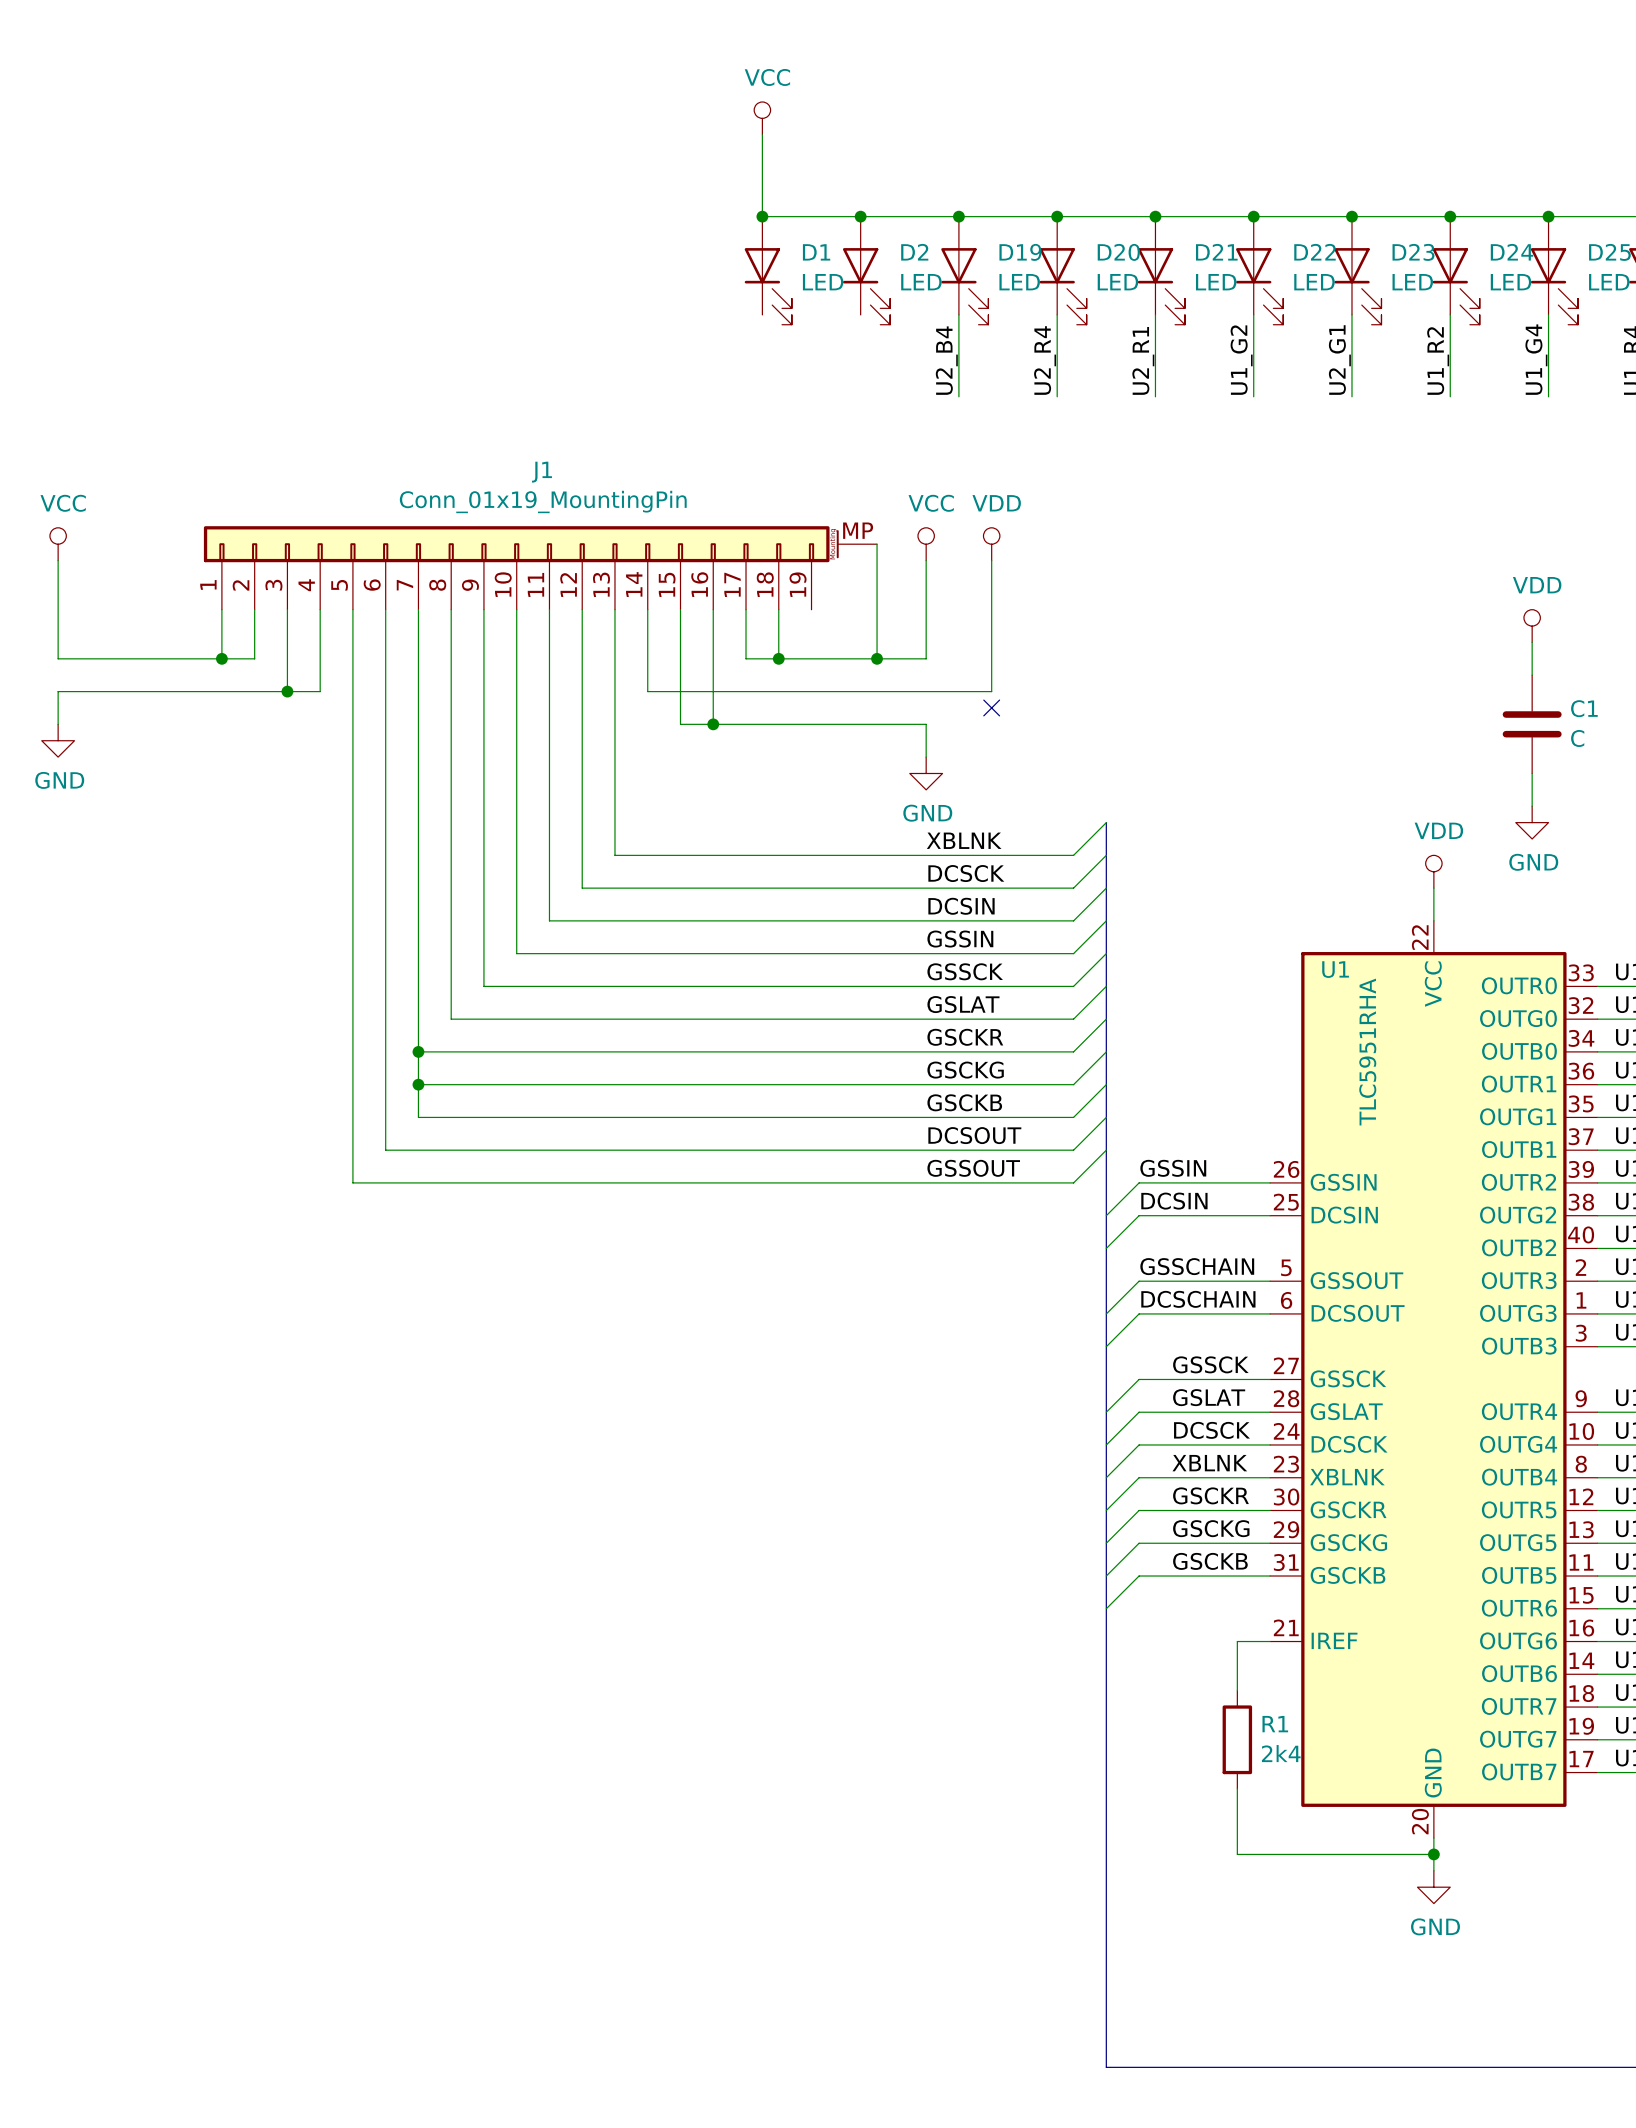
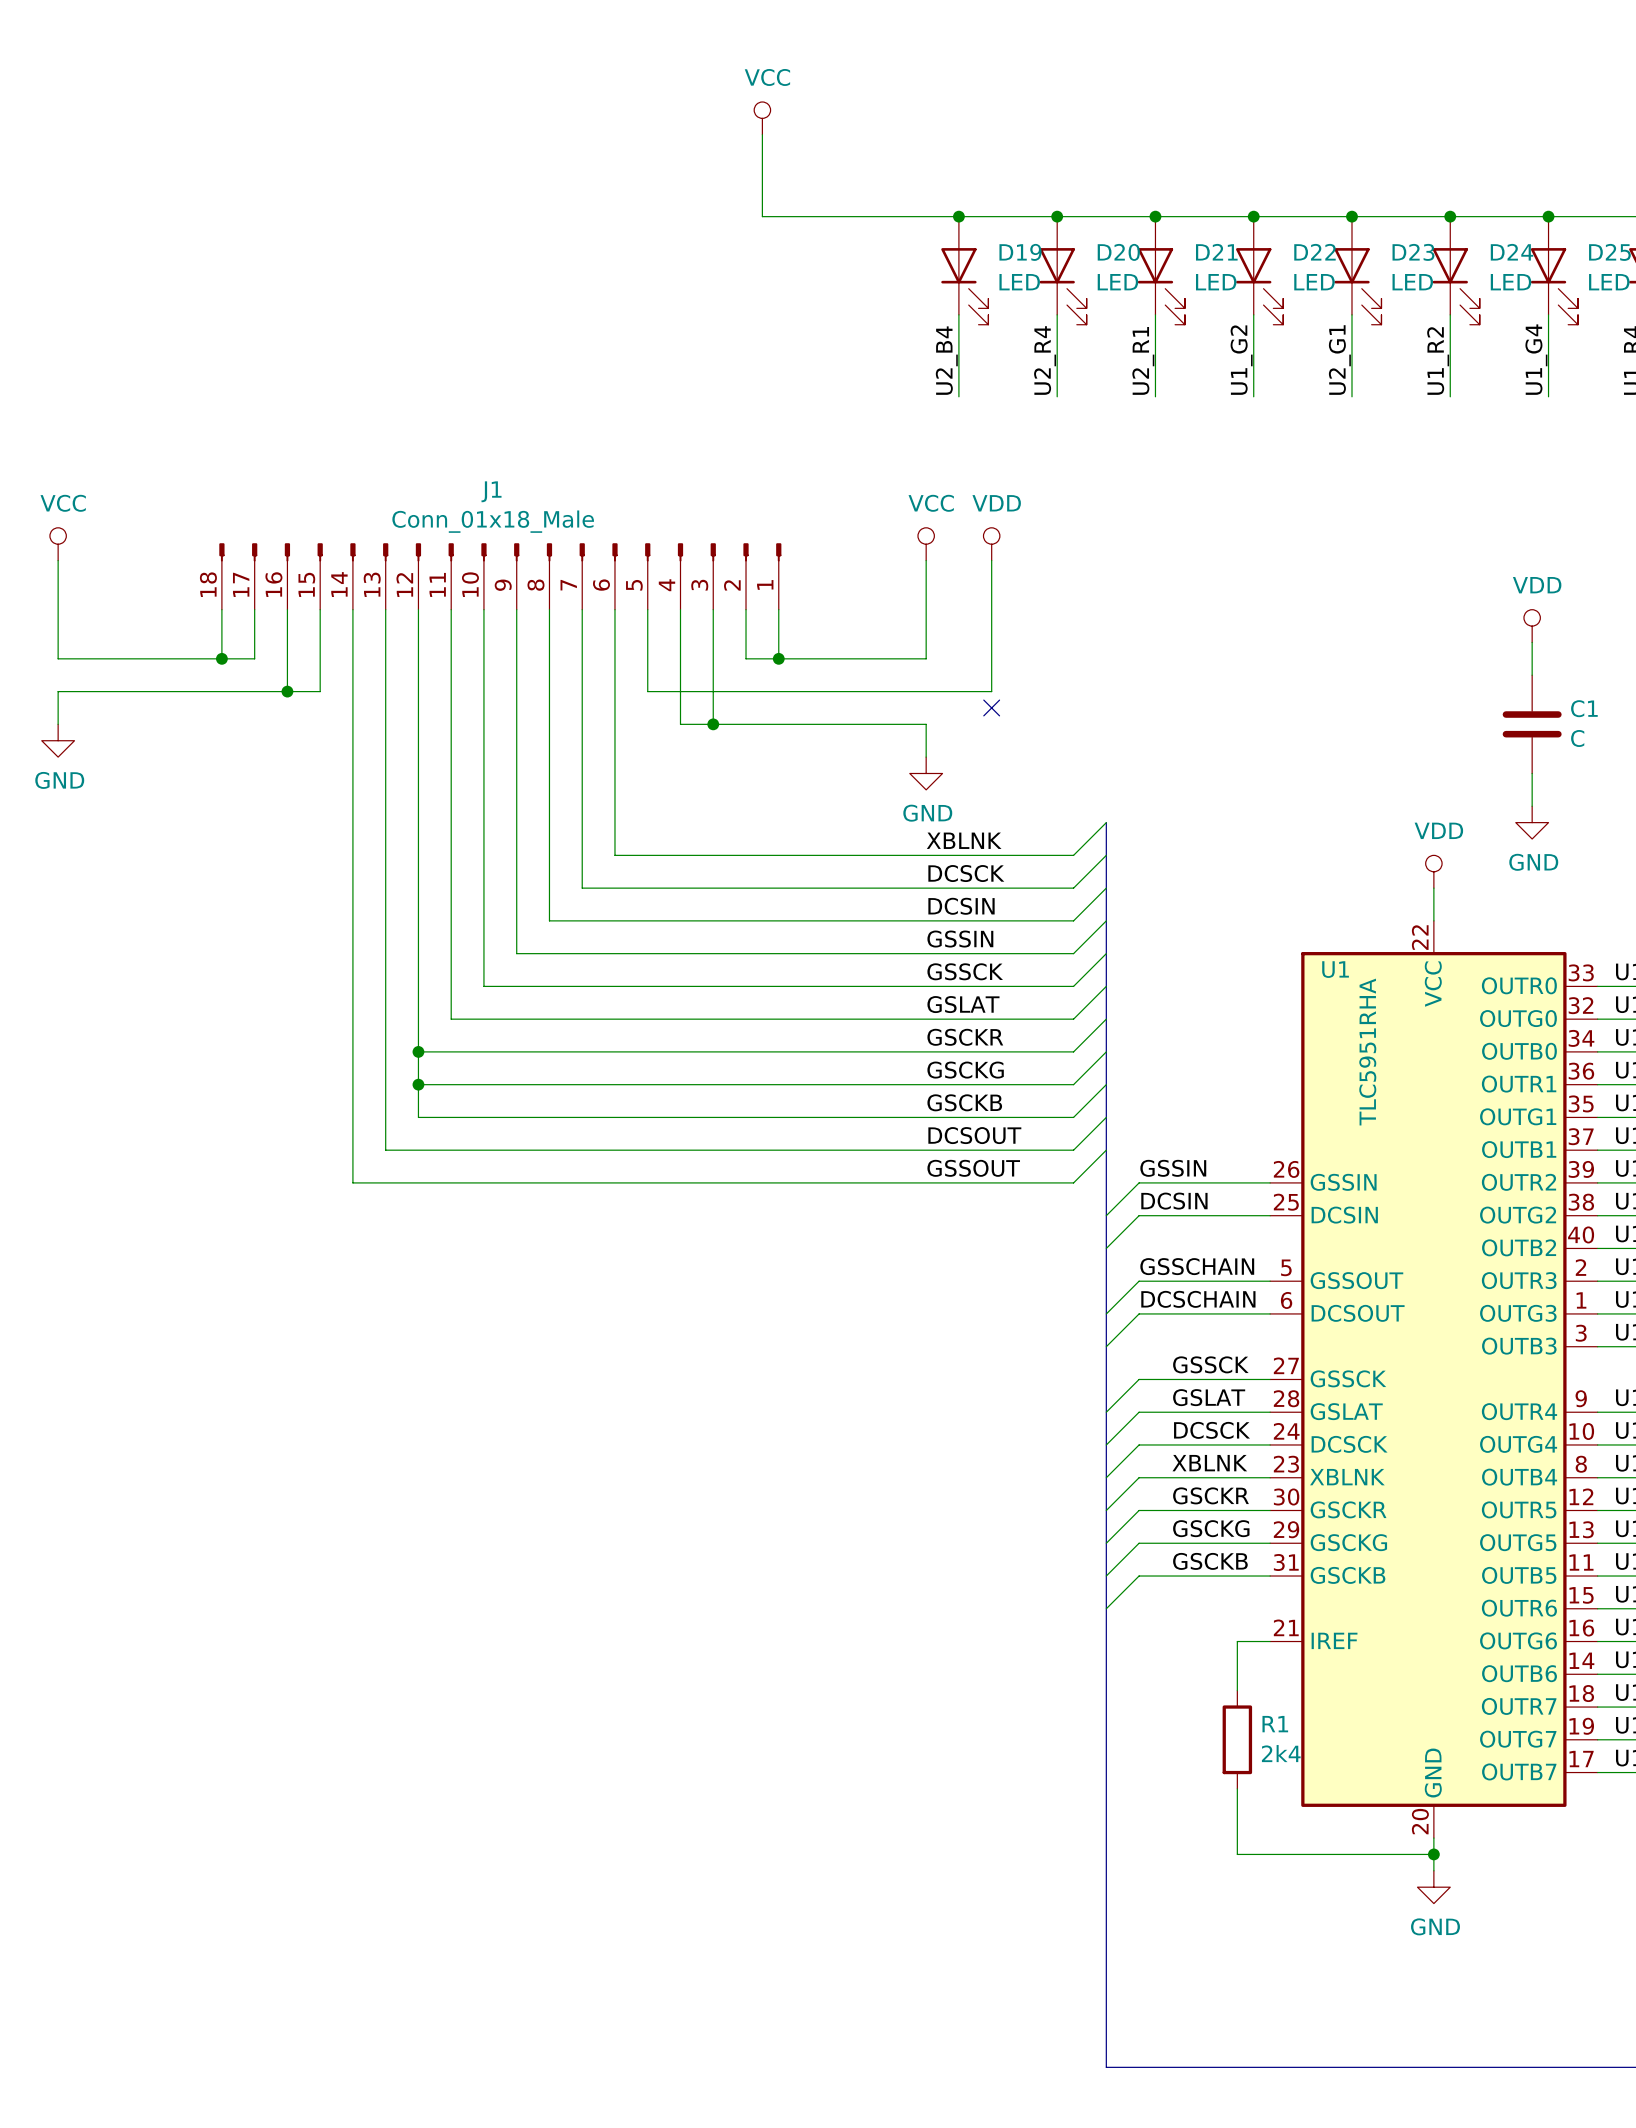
junction: (762, 216) -> none
junction: (860, 216) -> none
D1: LED (768, 270) -> none
D2: LED (866, 270) -> none
J1 value: Conn_01x19_MountingPin (543, 501) -> Conn_01x18_Male (493, 521)
J1 symbol: [203, 526, 878, 610] -> [219, 543, 782, 610]
wire: (877, 544) (877, 658) -> none
junction: (877, 658) -> none

